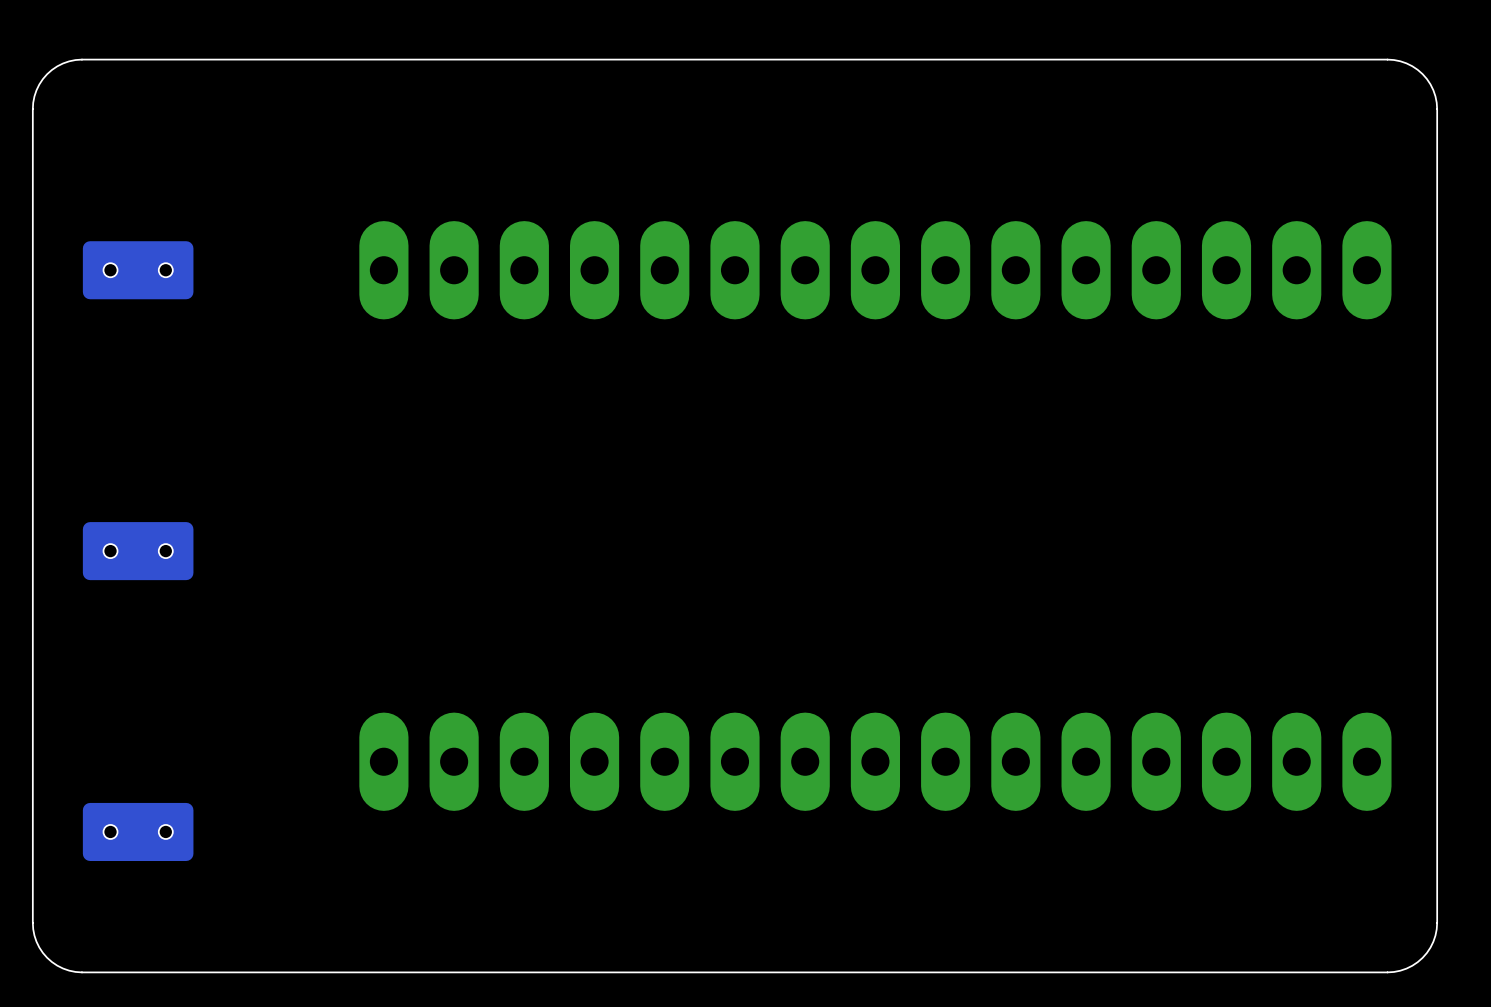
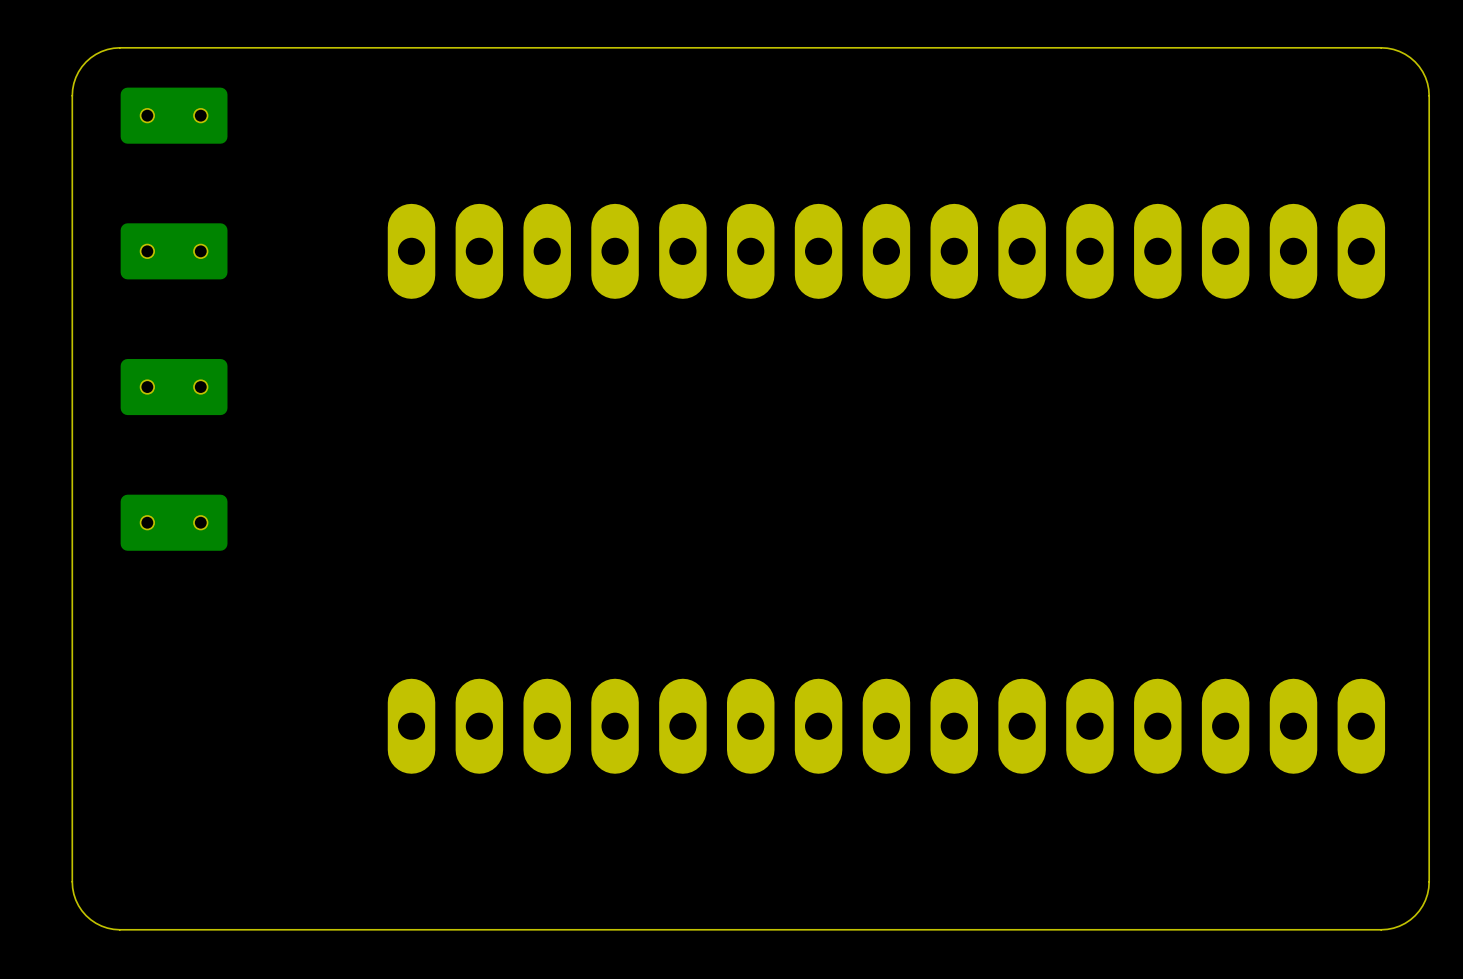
part: none -> (174, 115)
part: none -> (174, 387)
part: (138, 831) -> none

